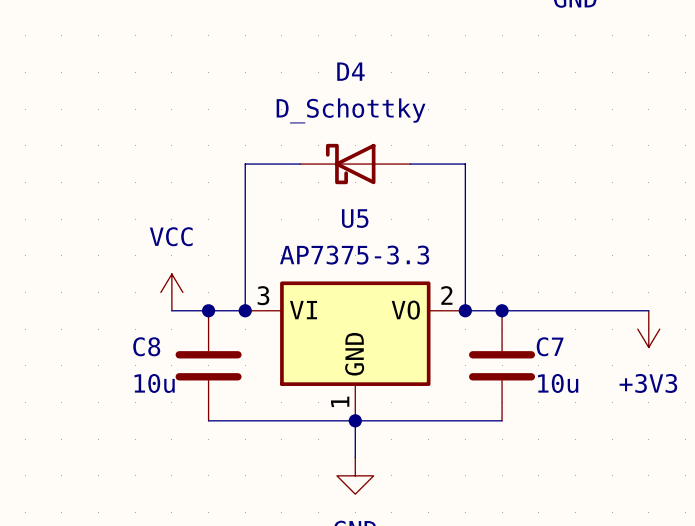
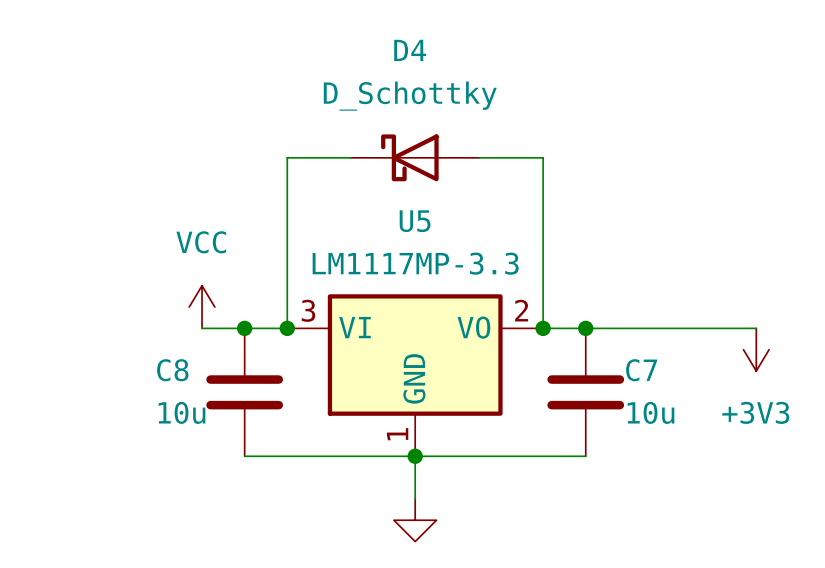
U5 value: AP7375-3.3 (354, 255) -> LM1117MP-3.3 (415, 263)

